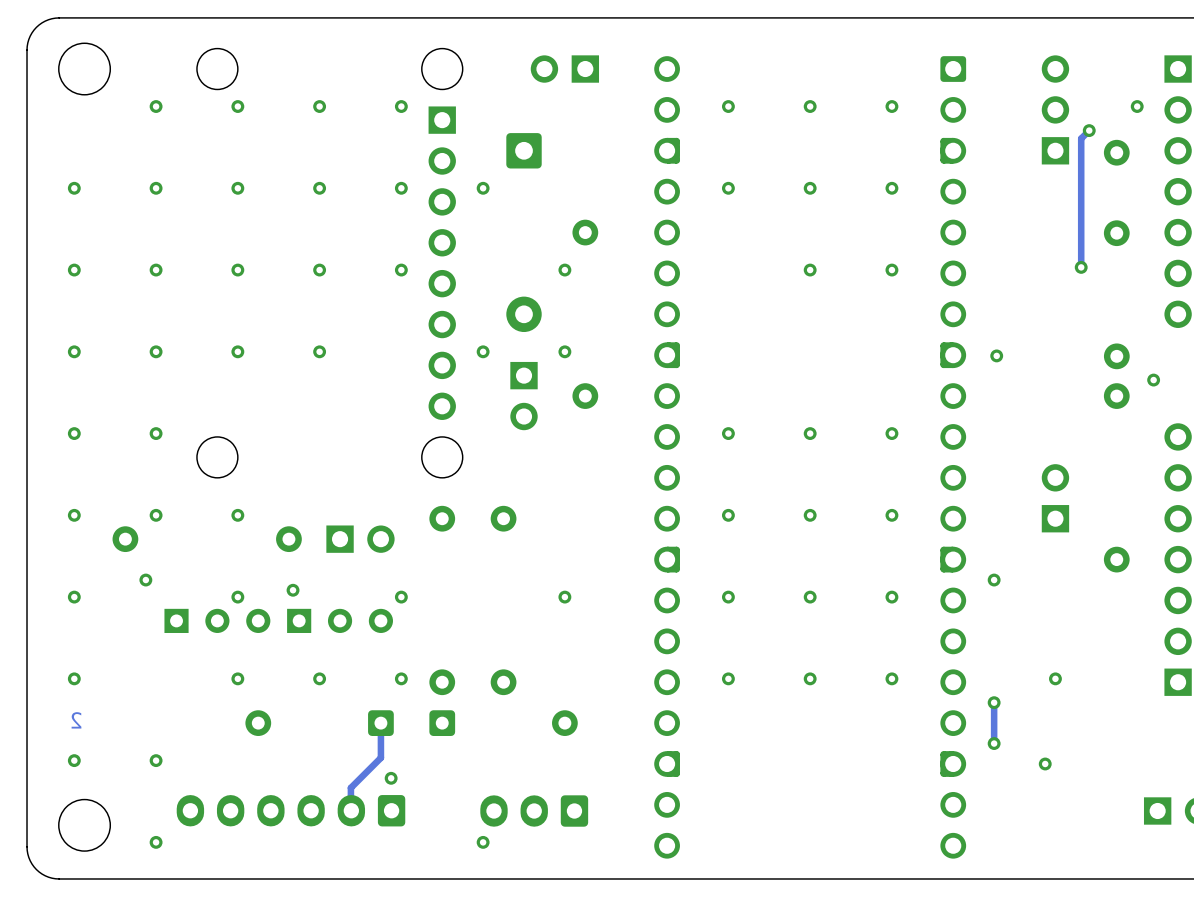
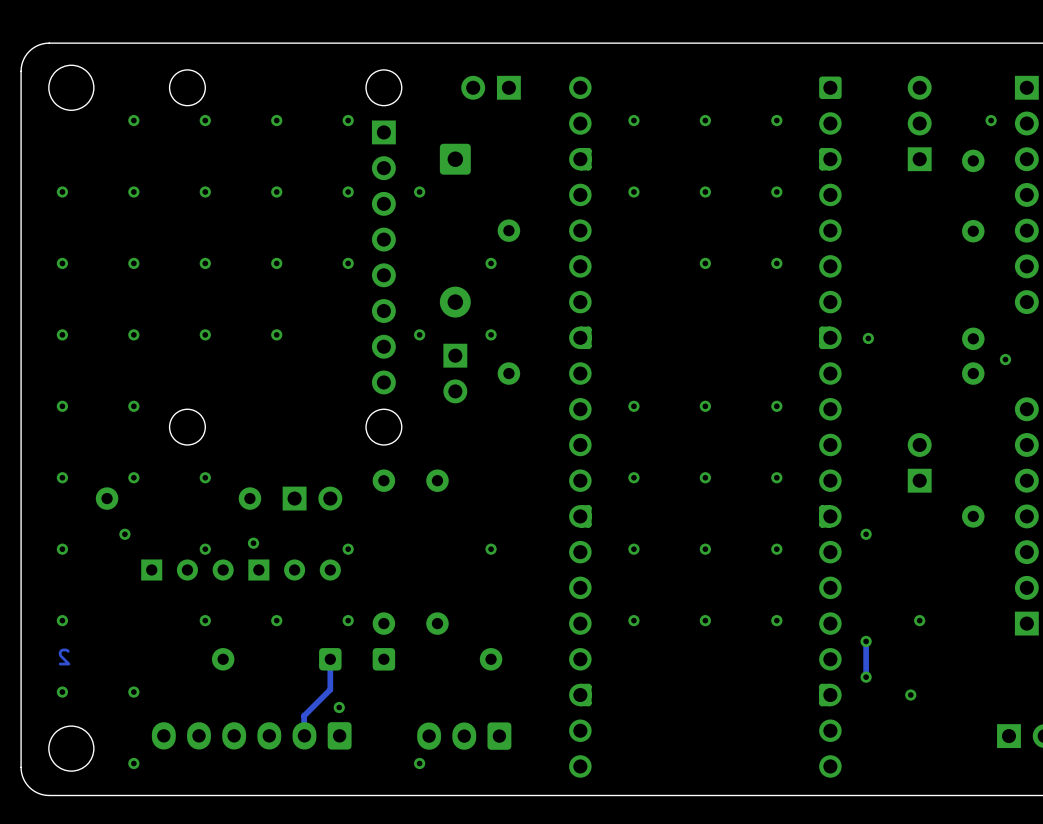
track: (1089, 130) (1081, 138) (1081, 267) -> none
via: (1089, 130) -> none
via: (1081, 267) -> none

